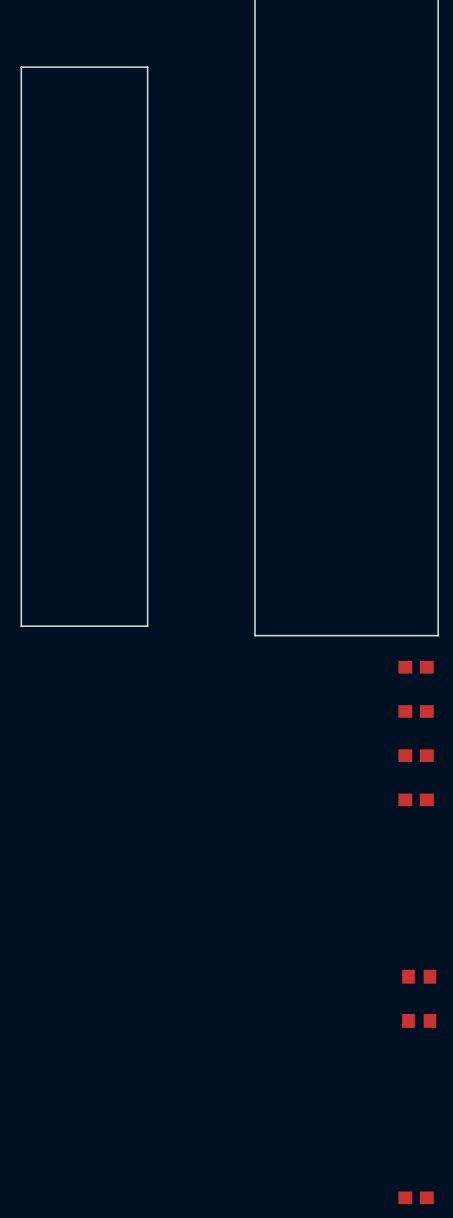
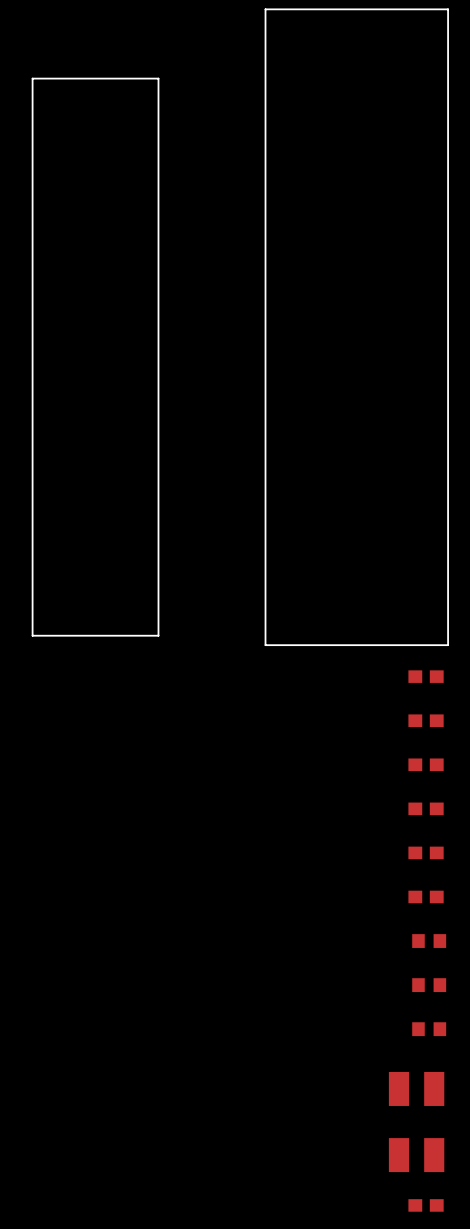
part: none -> (426, 852)
part: none -> (426, 896)
part: none -> (429, 941)
part: none -> (416, 1088)
part: none -> (416, 1155)

